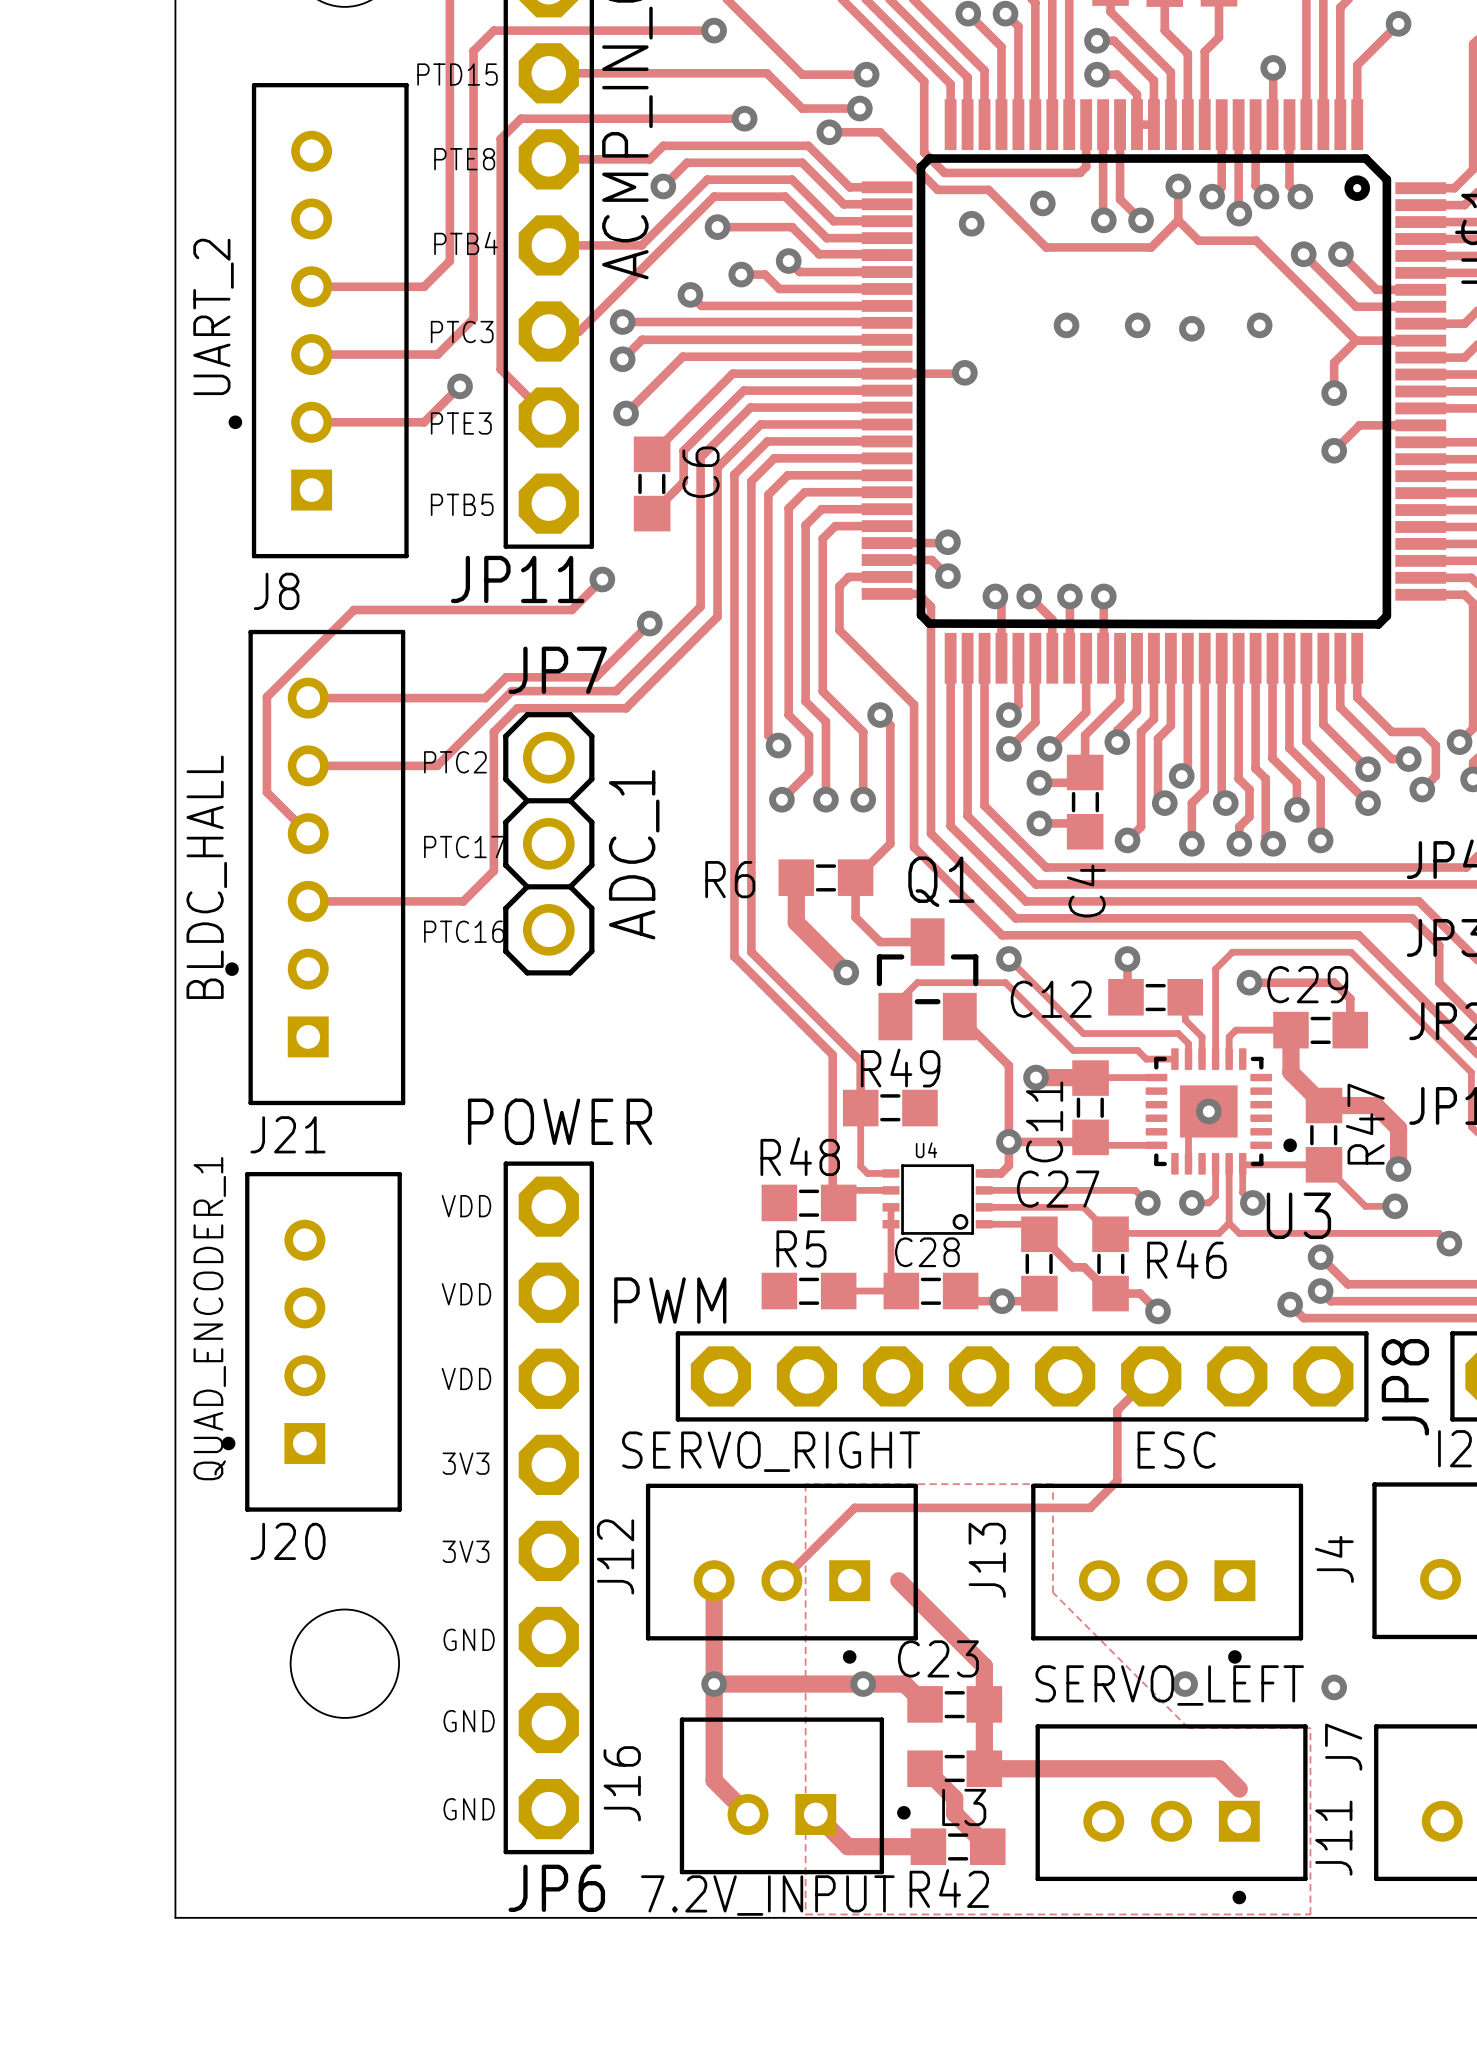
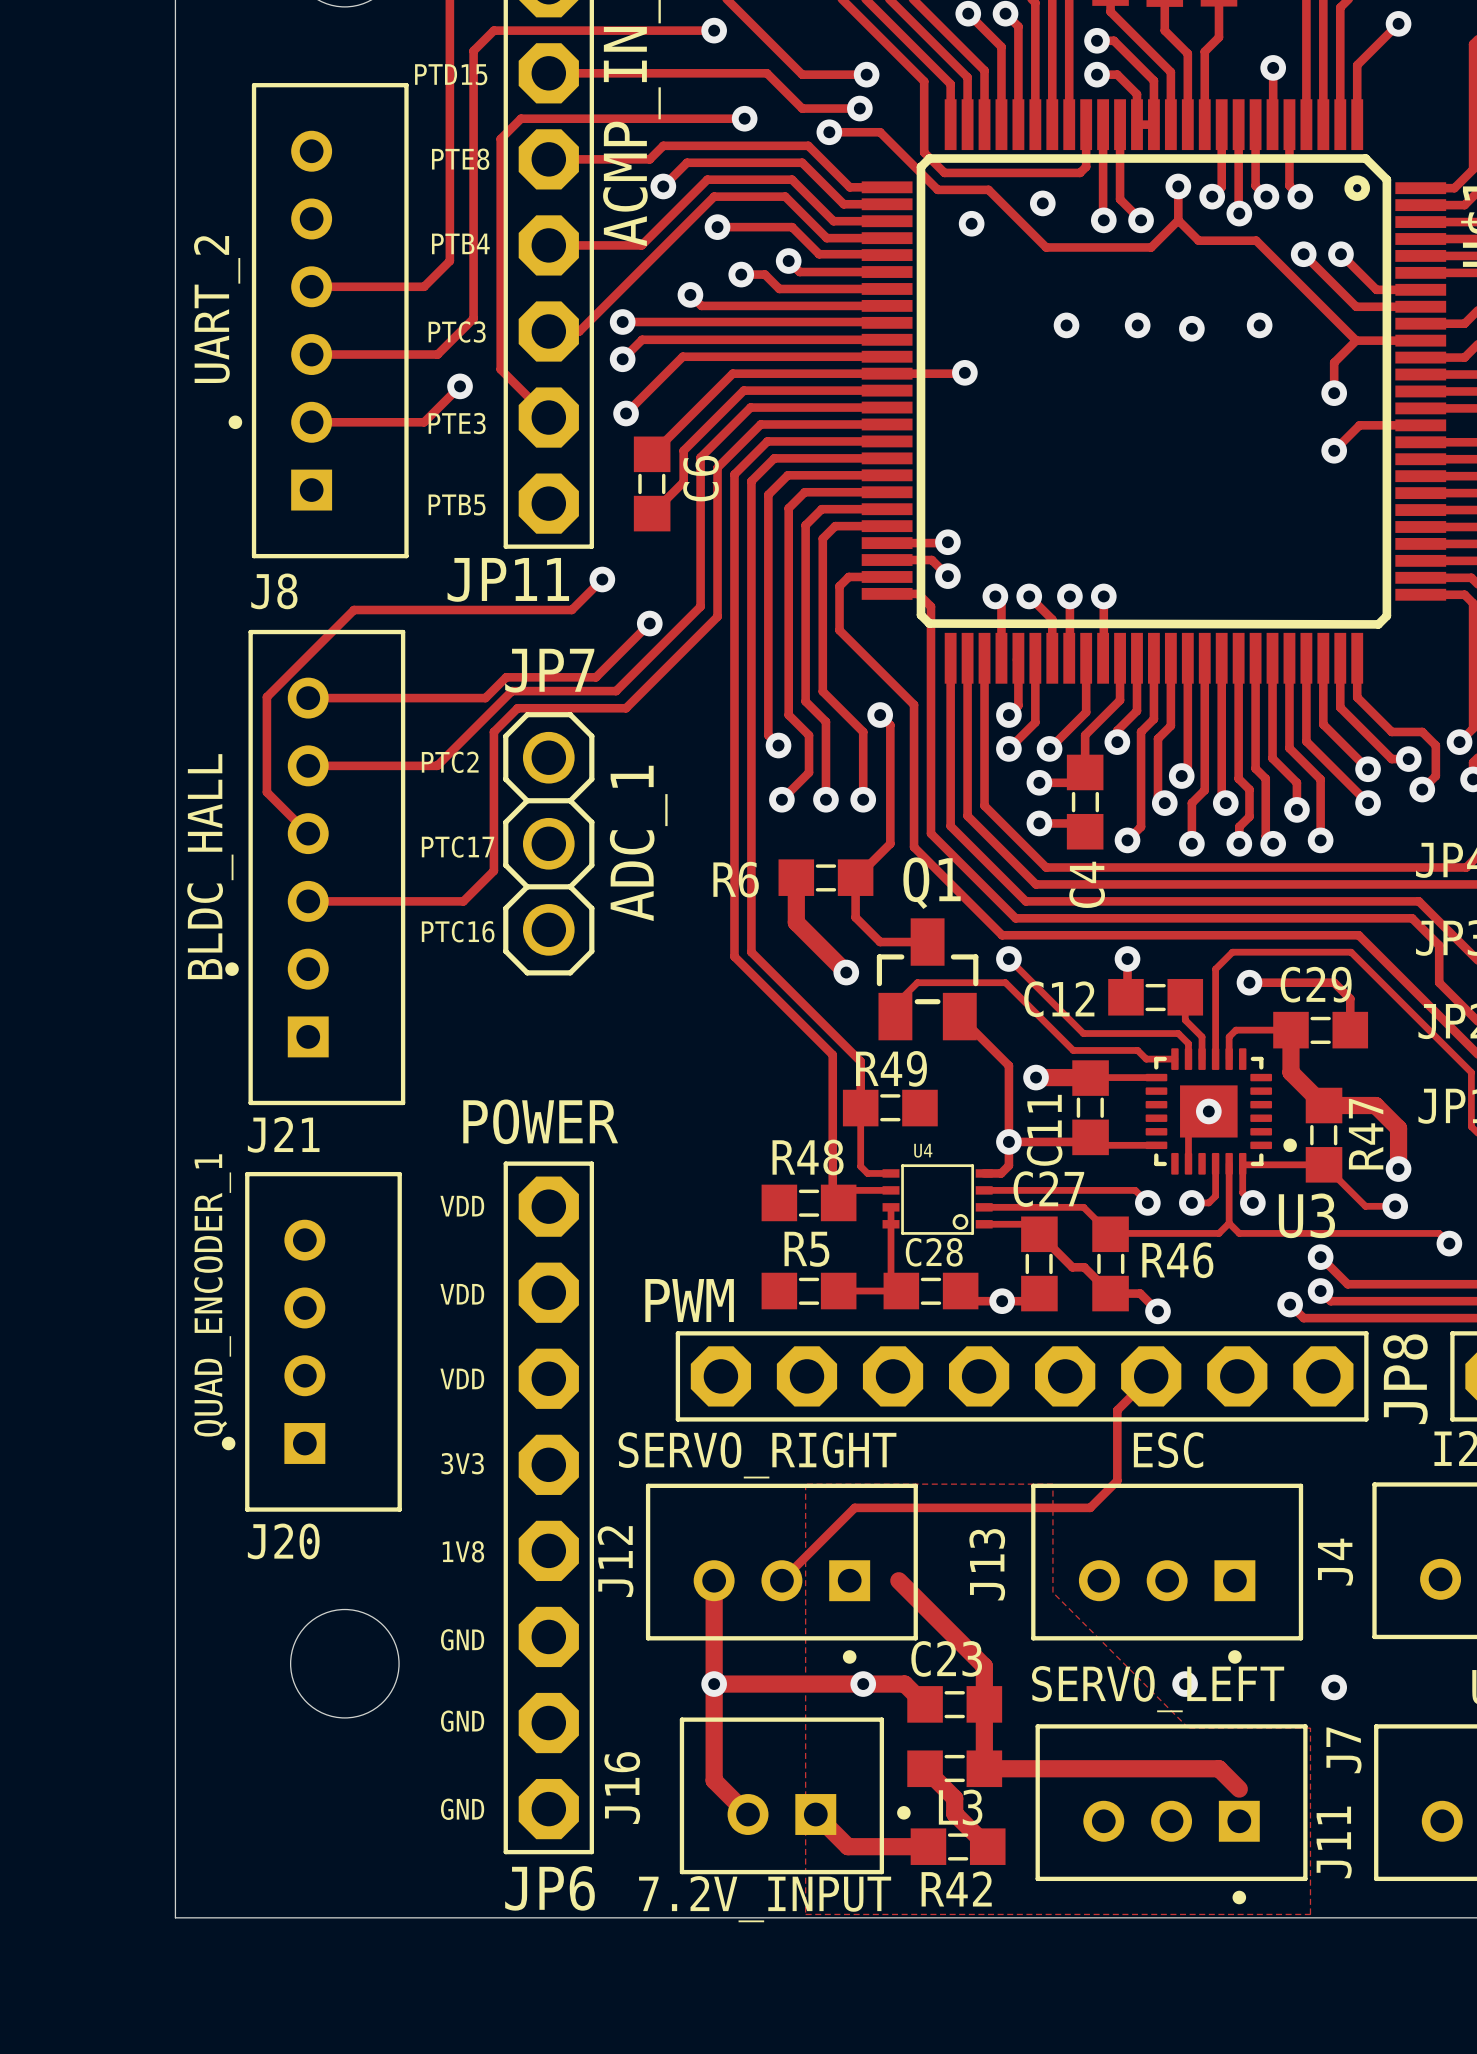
text: 3V3 (466, 1551) -> 1V8 (463, 1551)

